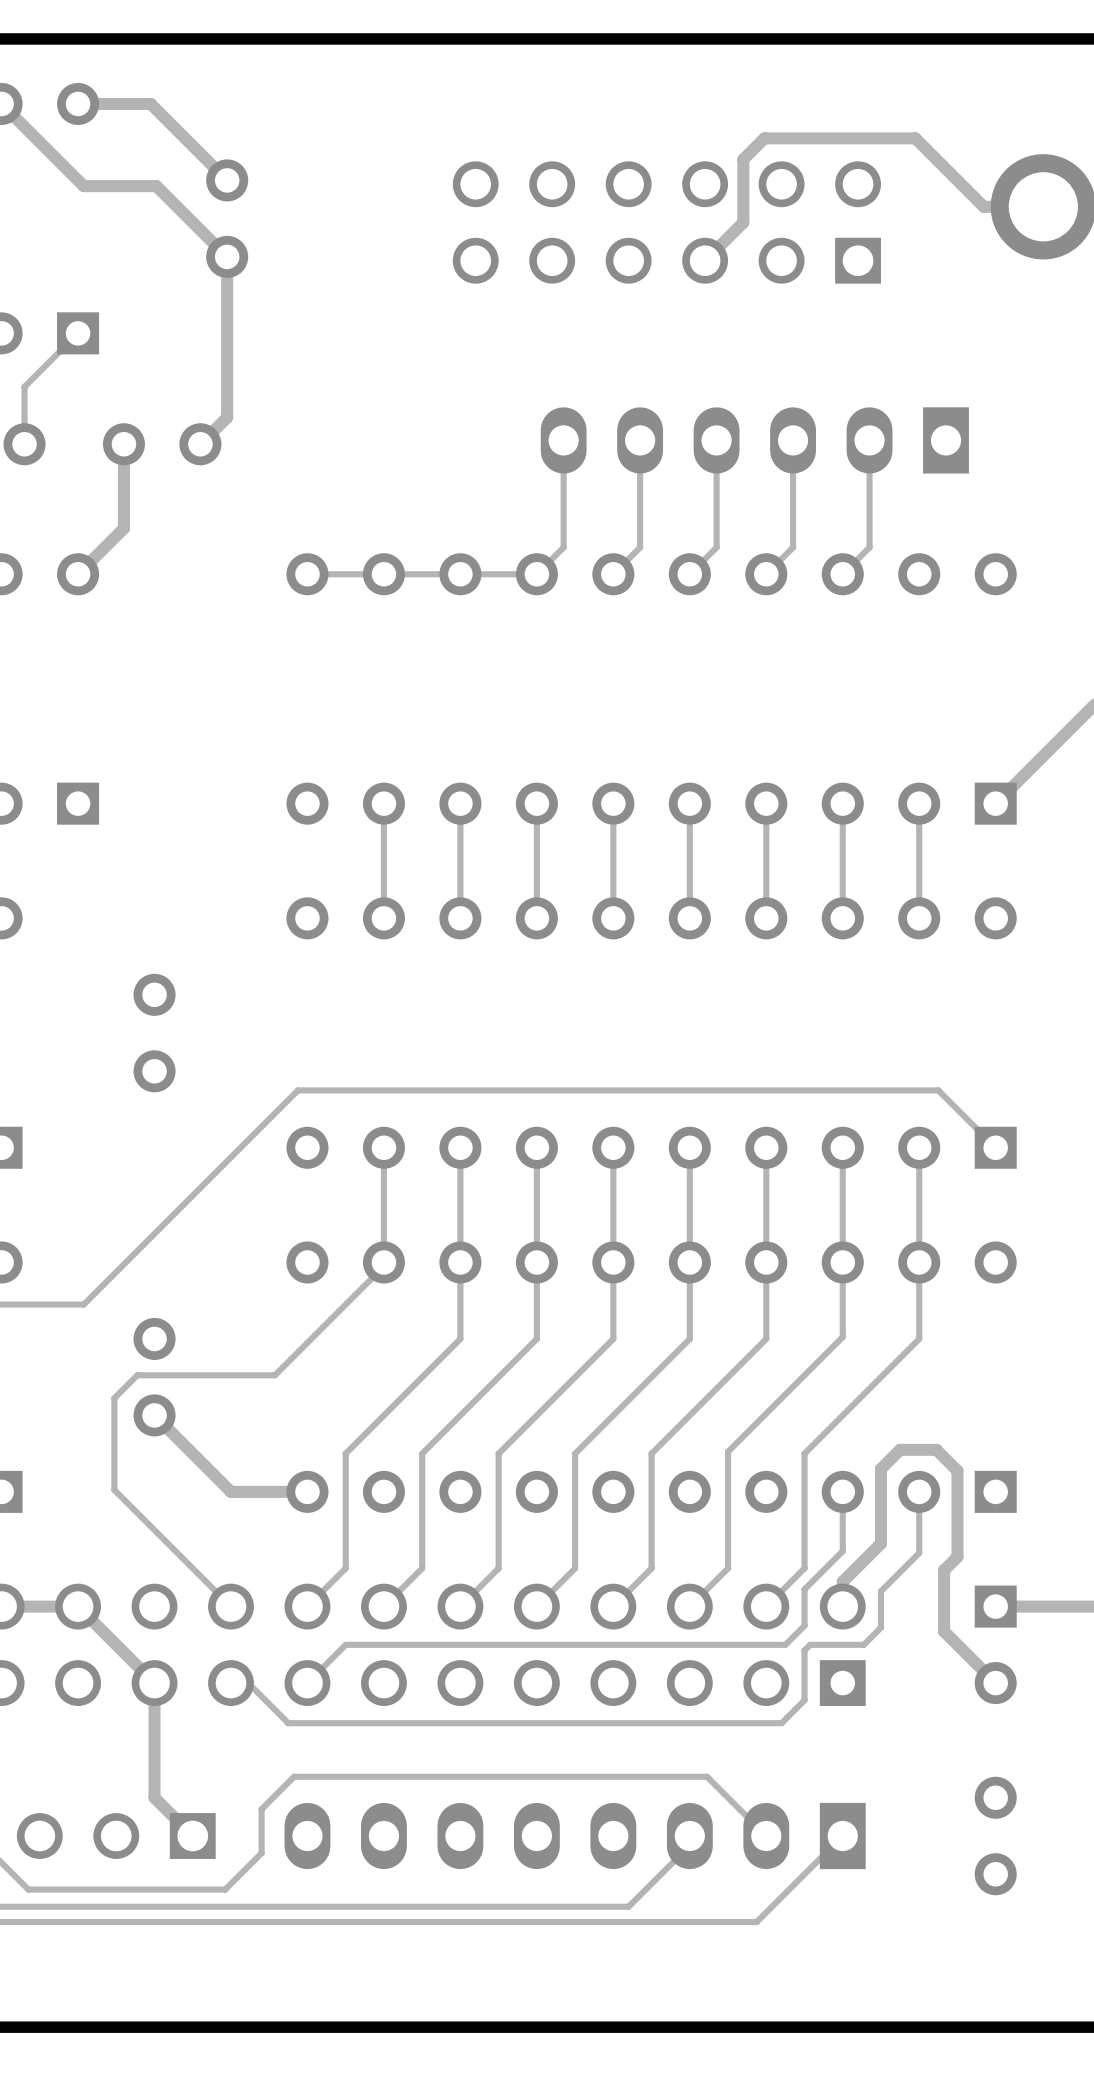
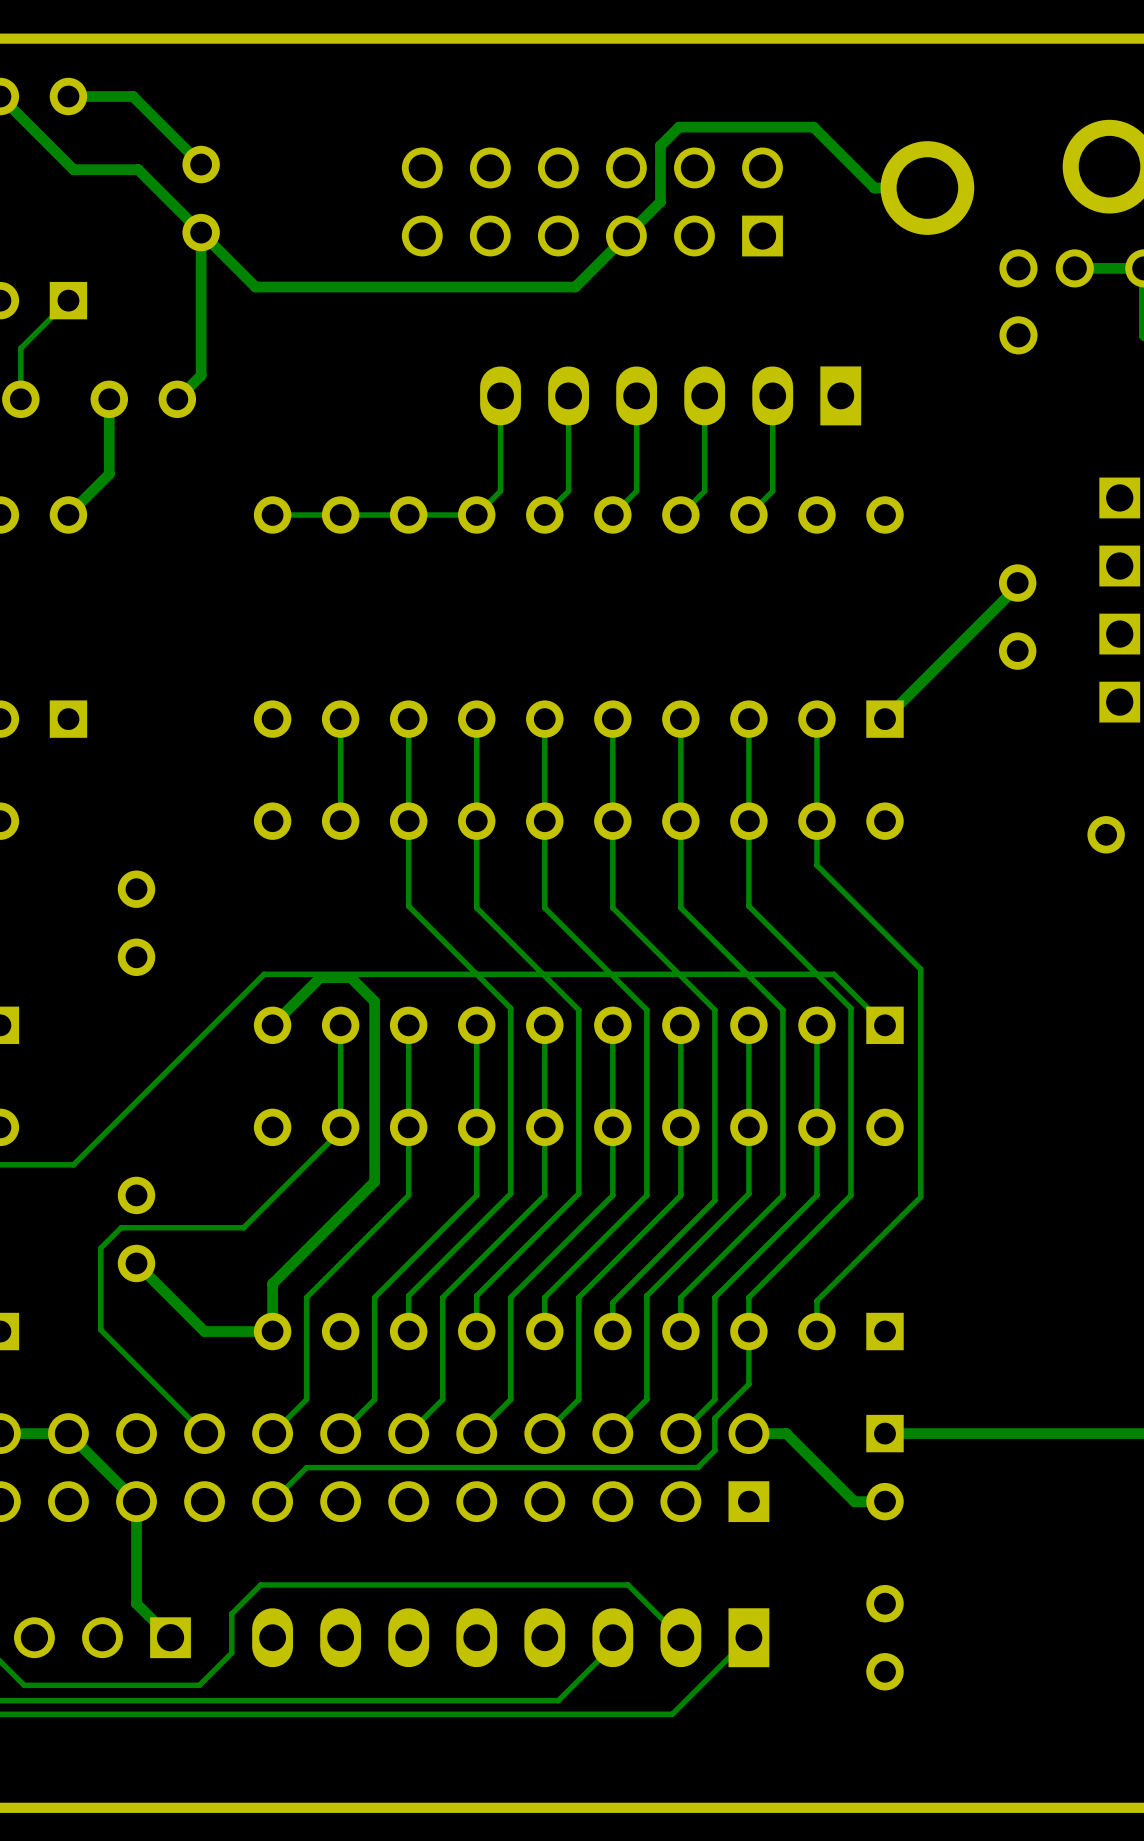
track: none -> (201, 232) (255, 287) (575, 287) (626, 236)
track: none -> (408, 821) (408, 906) (510, 1008) (510, 1193) (408, 1295) (408, 1331)
track: none -> (476, 821) (476, 907) (578, 1010) (578, 1193) (476, 1295) (476, 1331)
track: none -> (544, 821) (544, 907) (646, 1010) (646, 1195) (544, 1297) (544, 1331)
track: none -> (612, 821) (612, 907) (714, 1010) (714, 1200) (612, 1302) (612, 1331)
track: none -> (680, 821) (680, 907) (782, 1010) (782, 1195) (680, 1297) (680, 1331)
track: none -> (748, 821) (748, 906) (850, 1008) (850, 1195) (748, 1297) (748, 1331)
track: none -> (272, 1025) (320, 977) (350, 977) (374, 1001) (374, 1181) (272, 1283) (272, 1331)
track: (919, 1491) (919, 1553) (881, 1591) (881, 1627) (863, 1644) (810, 1644) (804, 1650) (804, 1700) (781, 1723) (288, 1723) (248, 1683) (231, 1683) -> (816, 1331) (816, 1300) (920, 1197) (920, 969) (816, 865) (816, 821)
track: (842, 1606) (842, 1581) (881, 1543) (881, 1468) (900, 1449) (936, 1449) (957, 1470) (957, 1556) (944, 1570) (944, 1631) (995, 1683) -> (748, 1433) (786, 1433) (854, 1501) (884, 1501)

